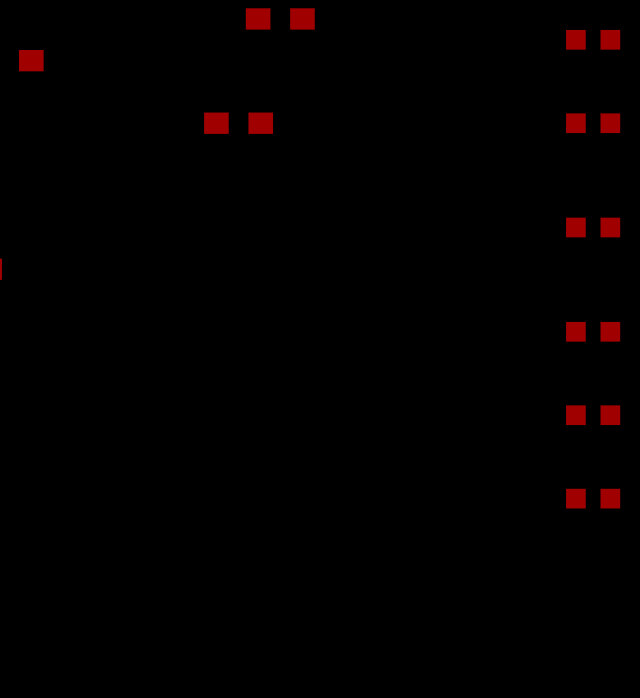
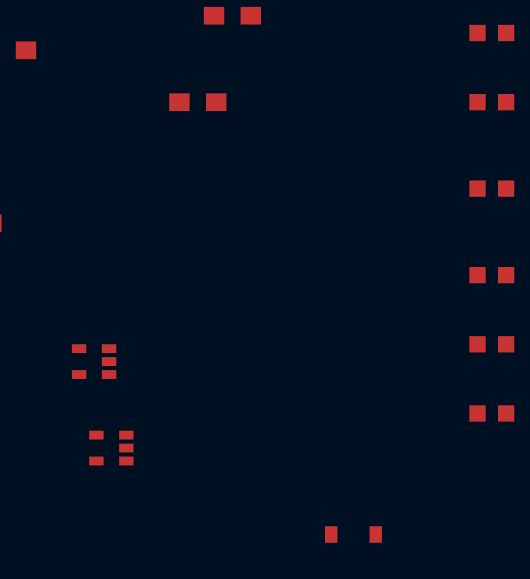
part: none -> (94, 361)
part: none -> (111, 448)
part: none -> (353, 534)

